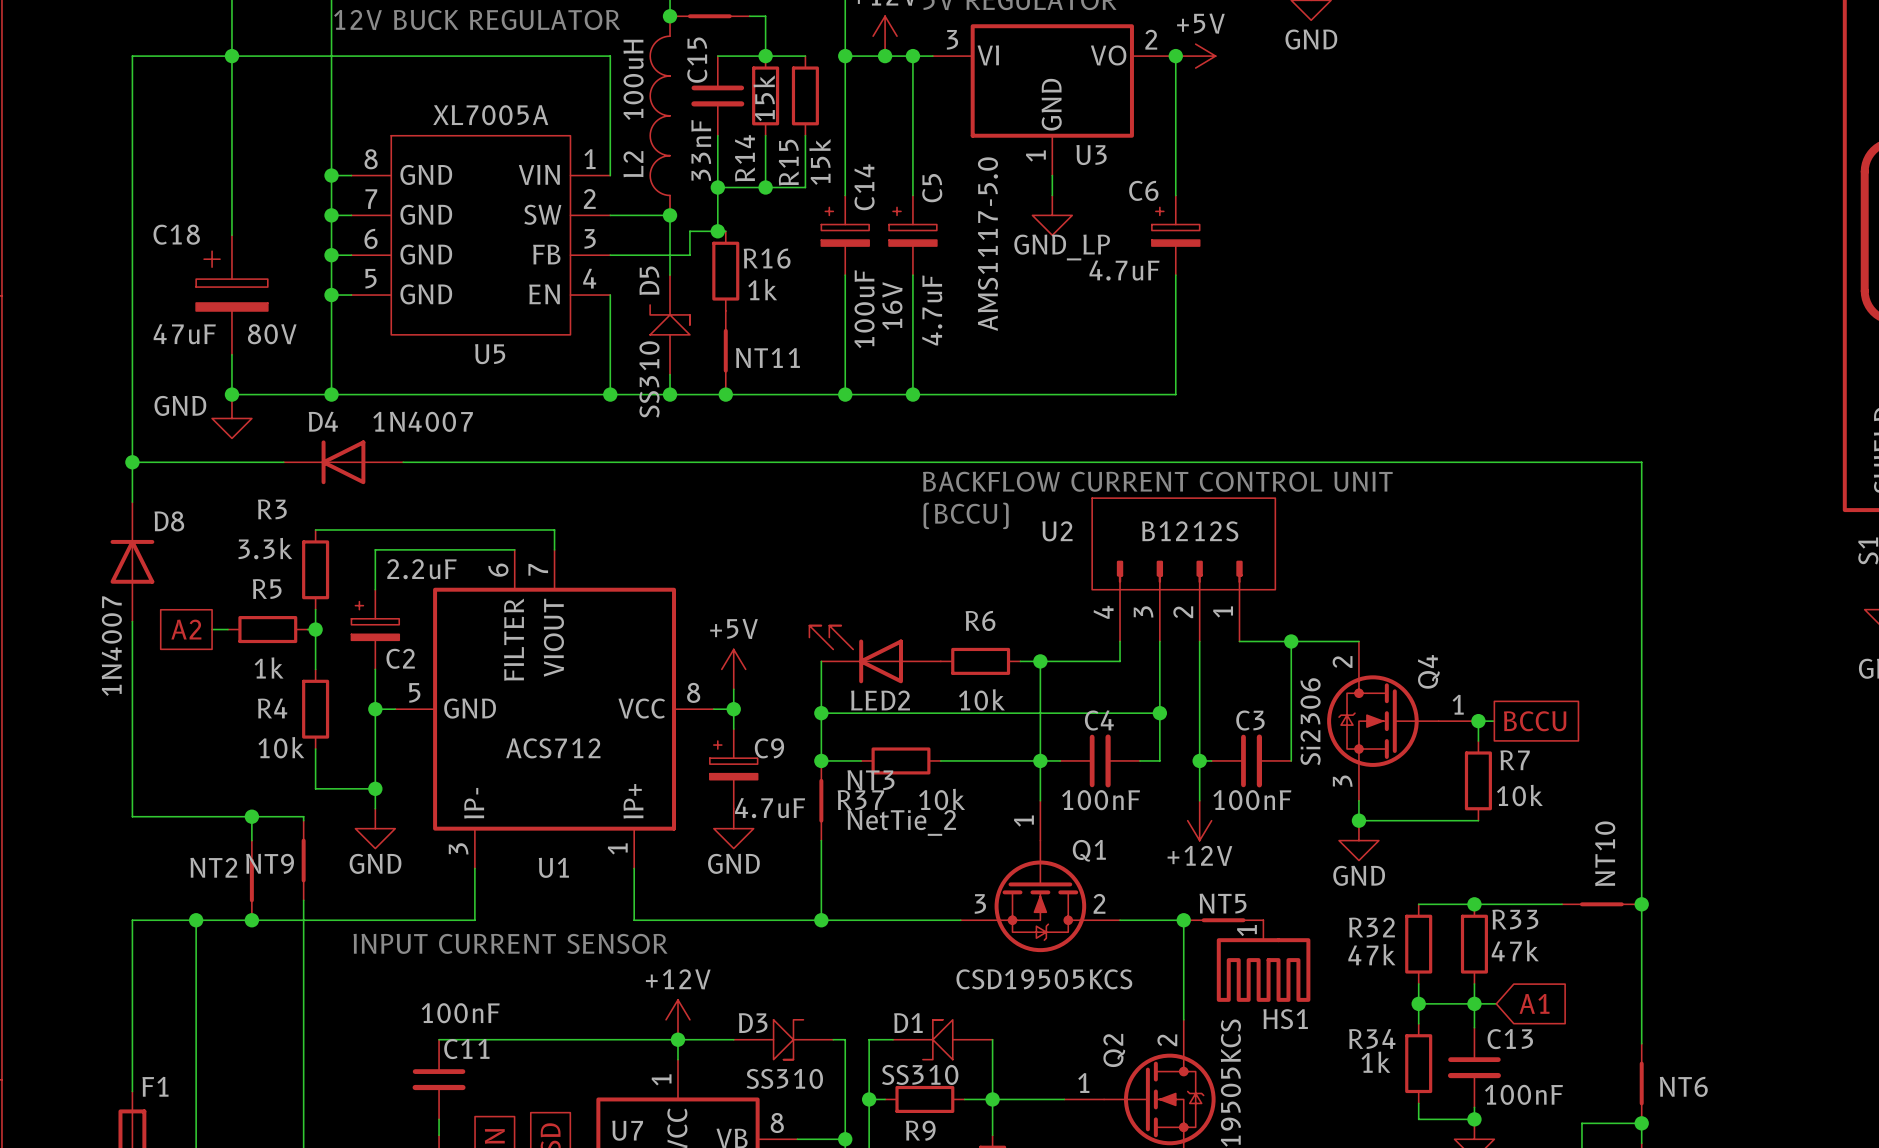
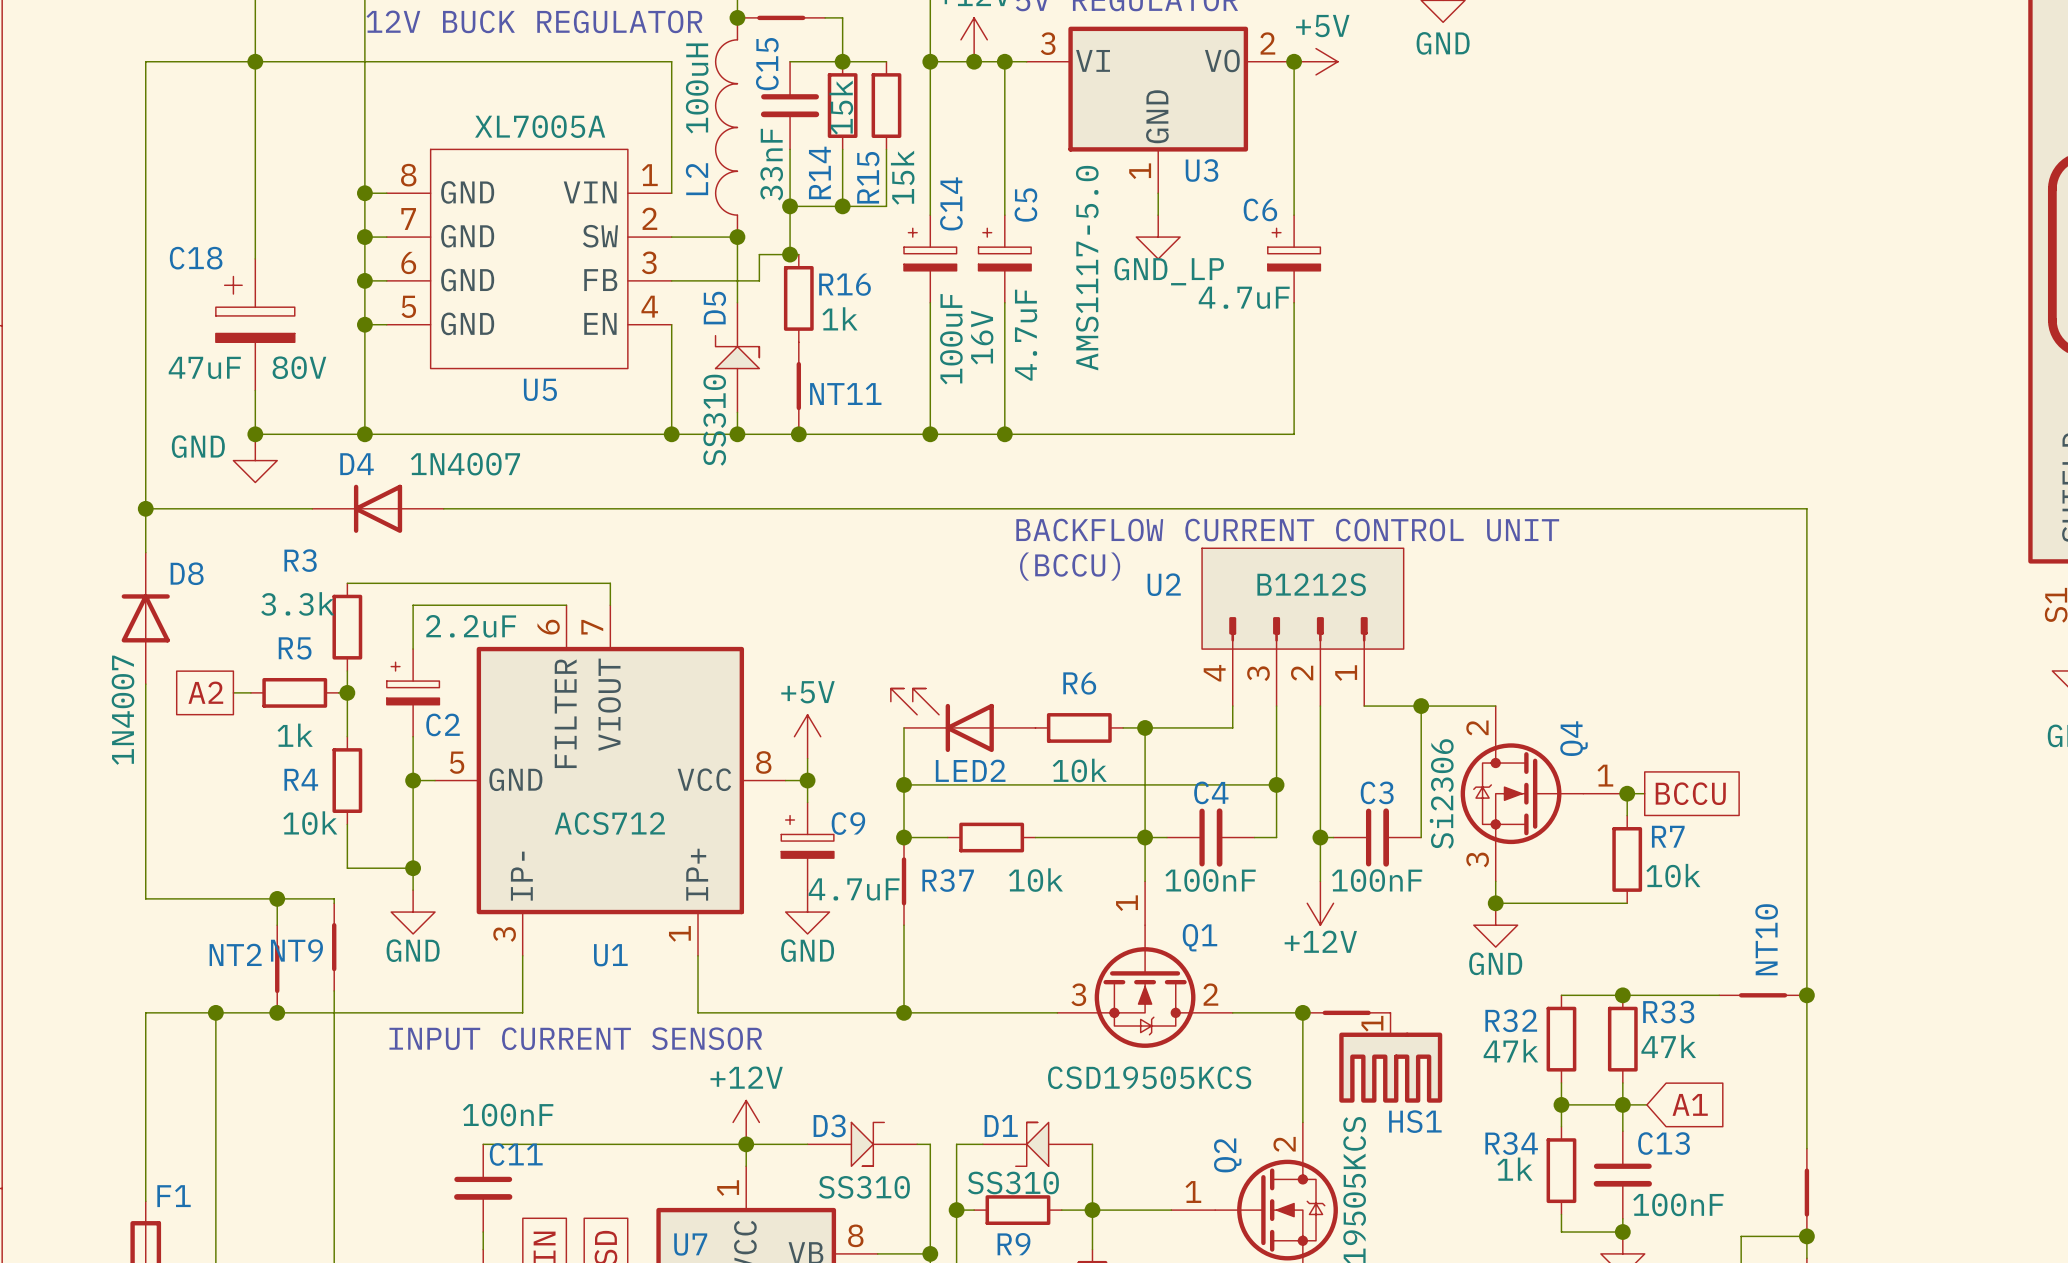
NT3 name: NT3 (870, 780) -> none
NT3 value: NetTie_2 (901, 822) -> none
NT5 name: NT5 (1223, 903) -> none
NT6 name: NT6 (1683, 1086) -> none

